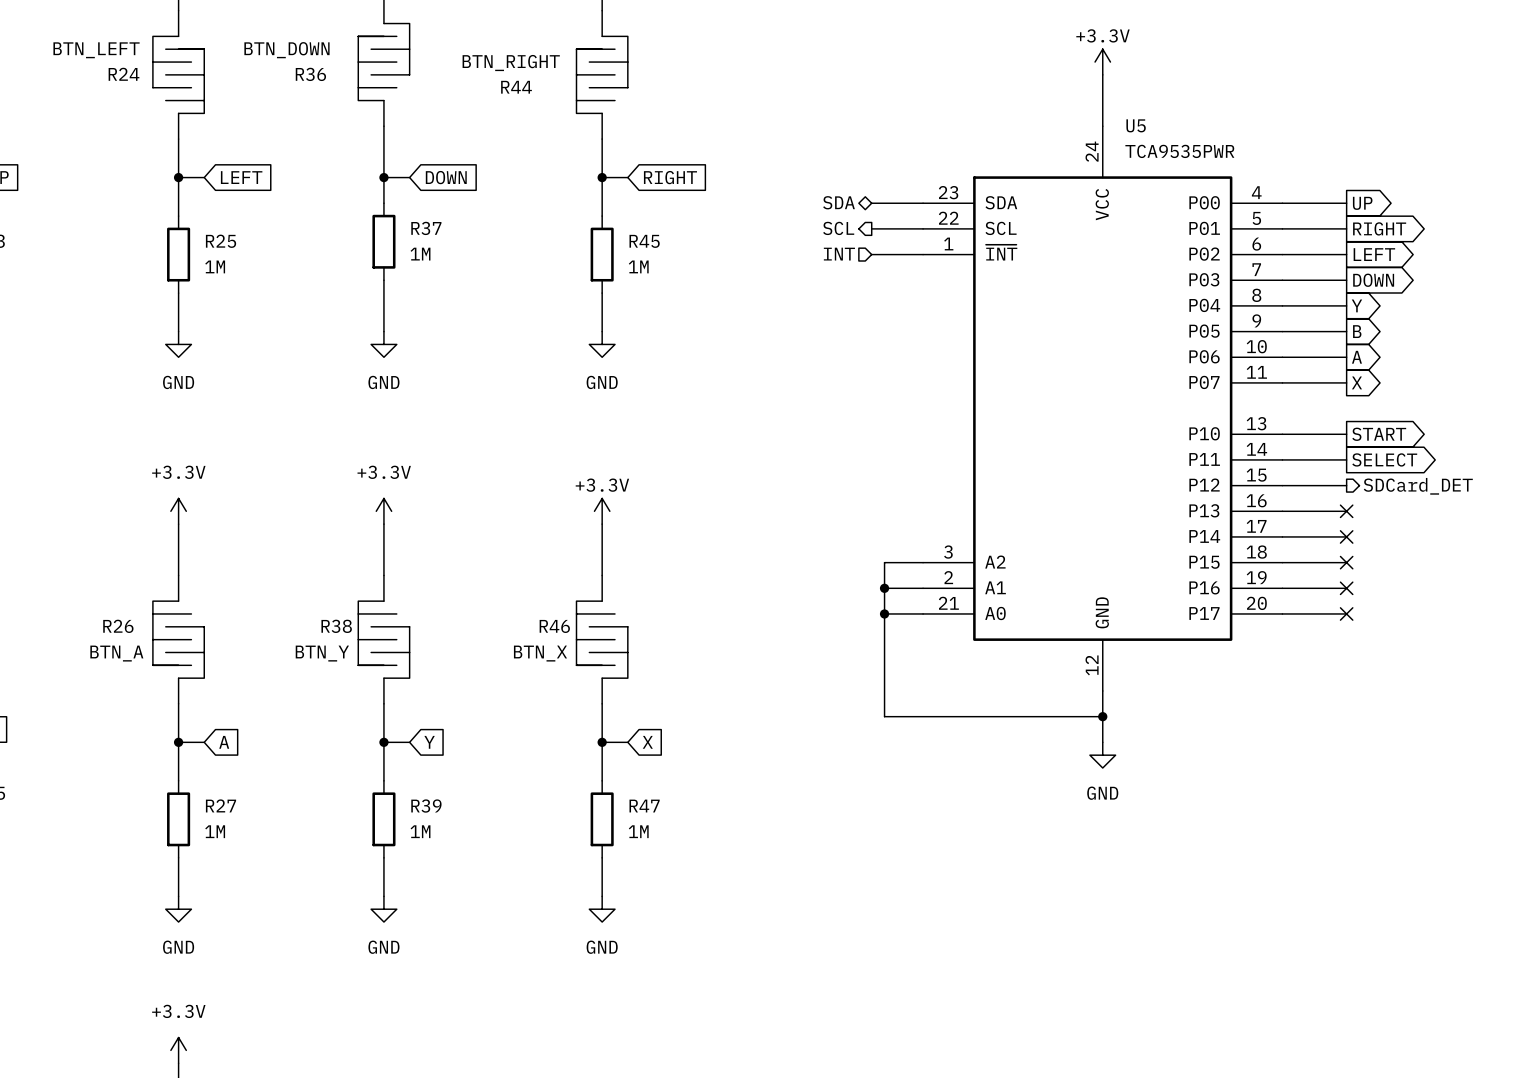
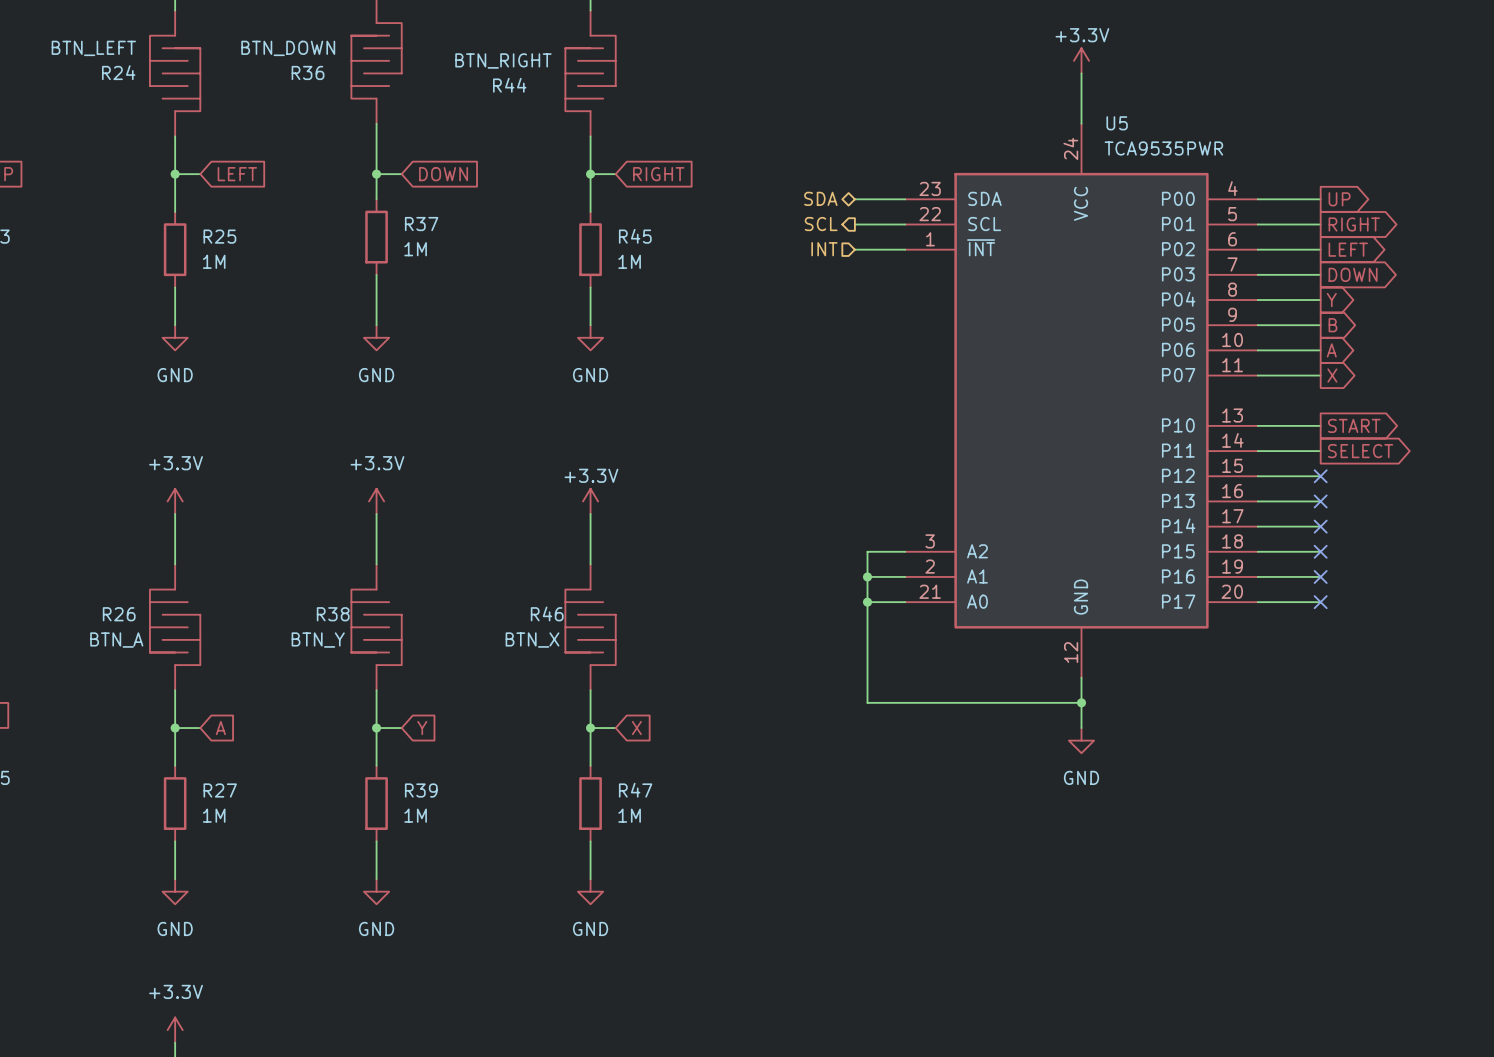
no-connect mark: none -> (1320, 476)
hierarchical label: SDCard_DET (1418, 486) -> none

